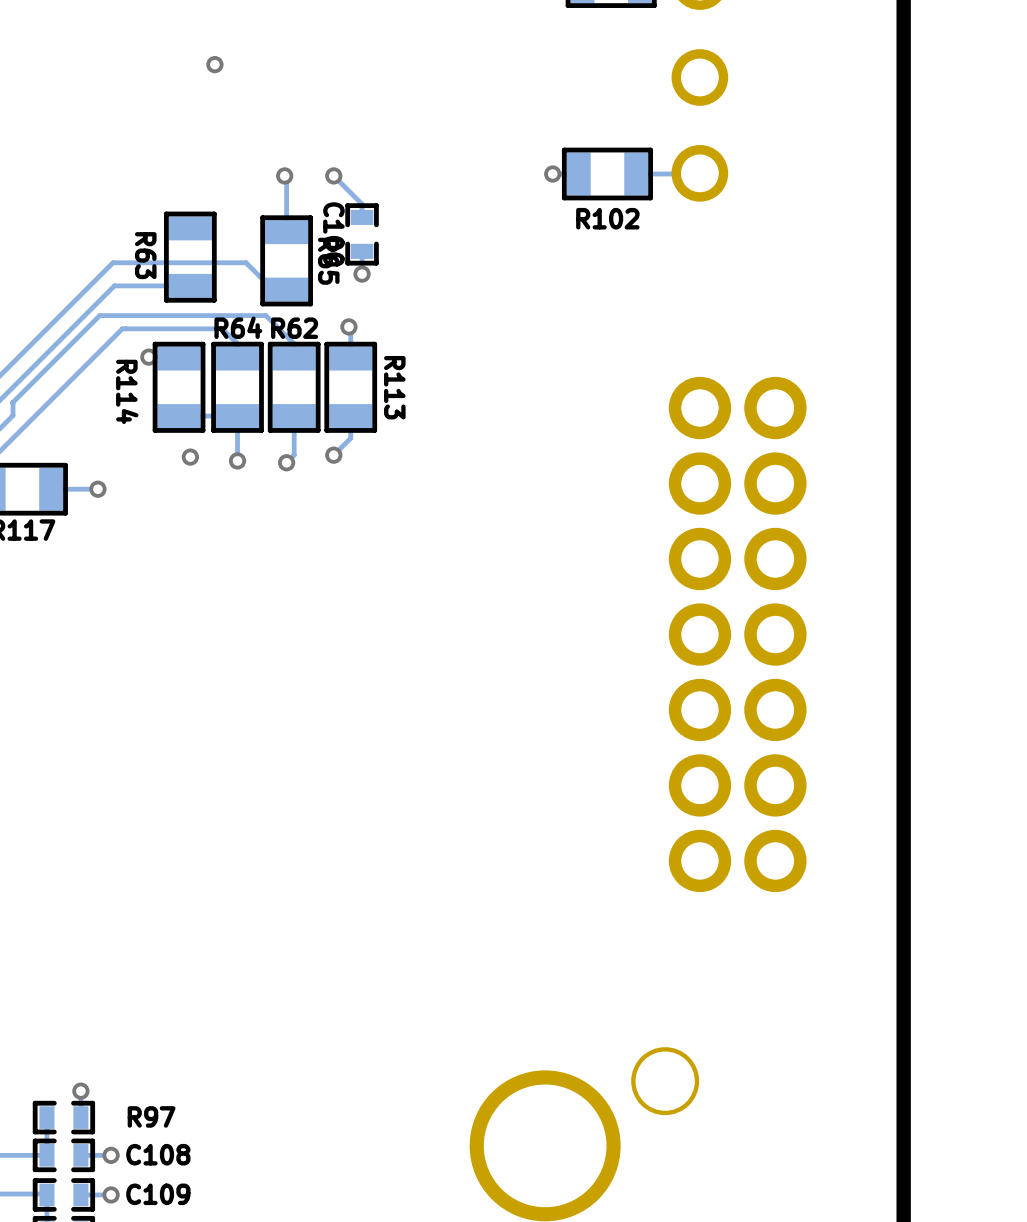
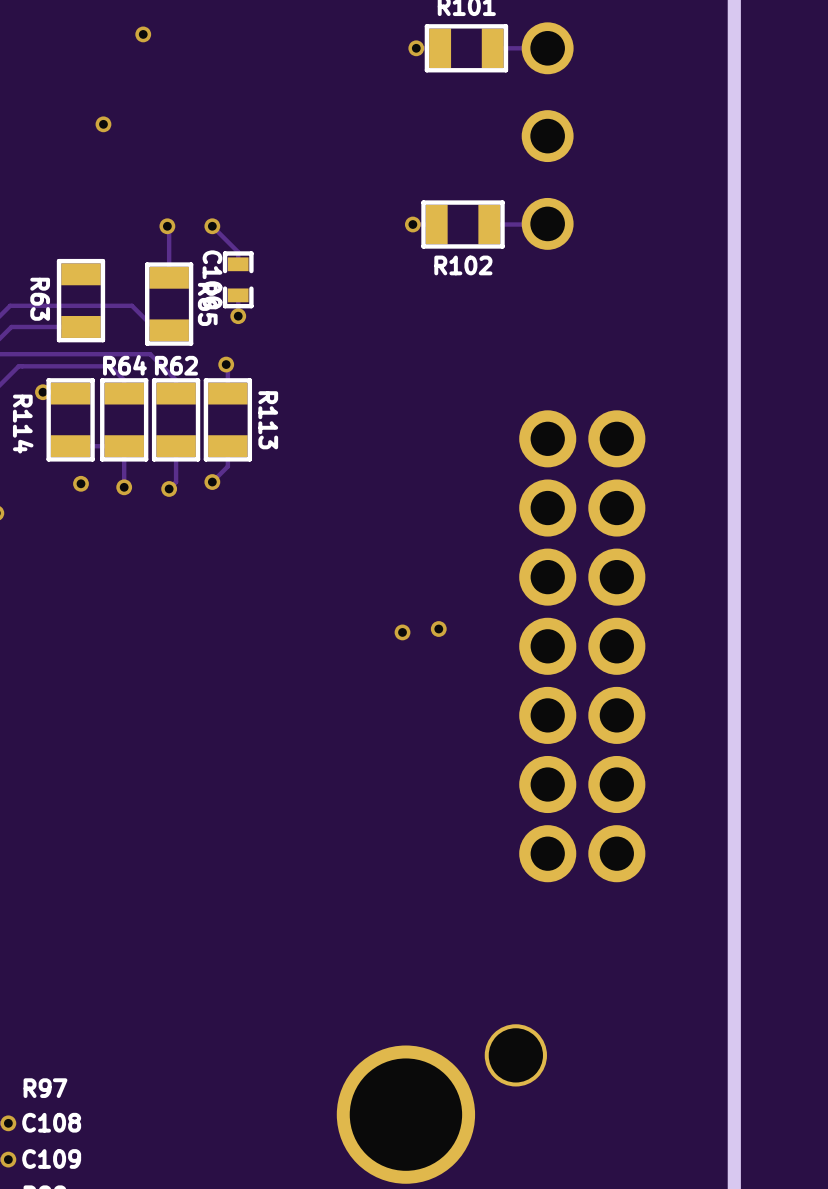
via: none -> (438, 629)
via: none -> (402, 632)

